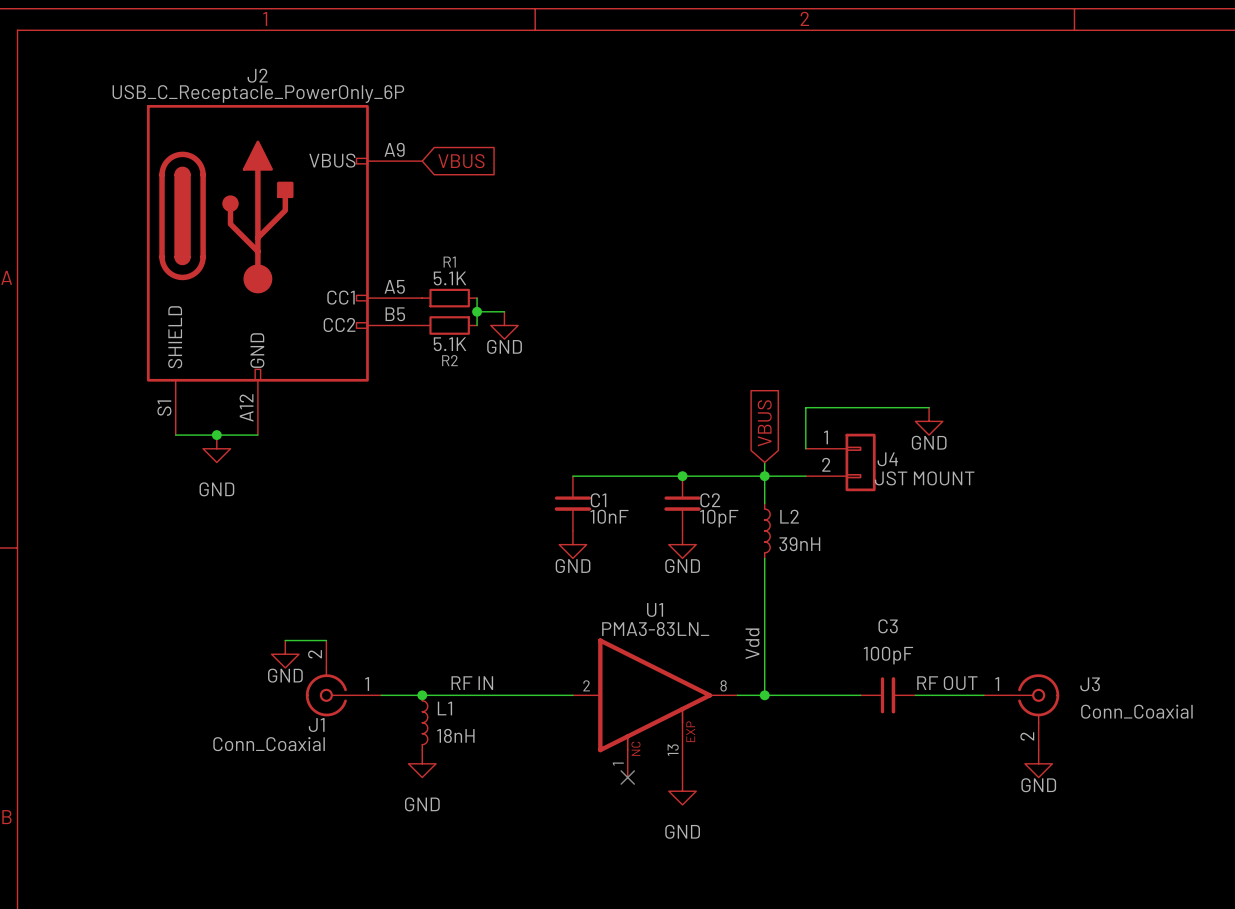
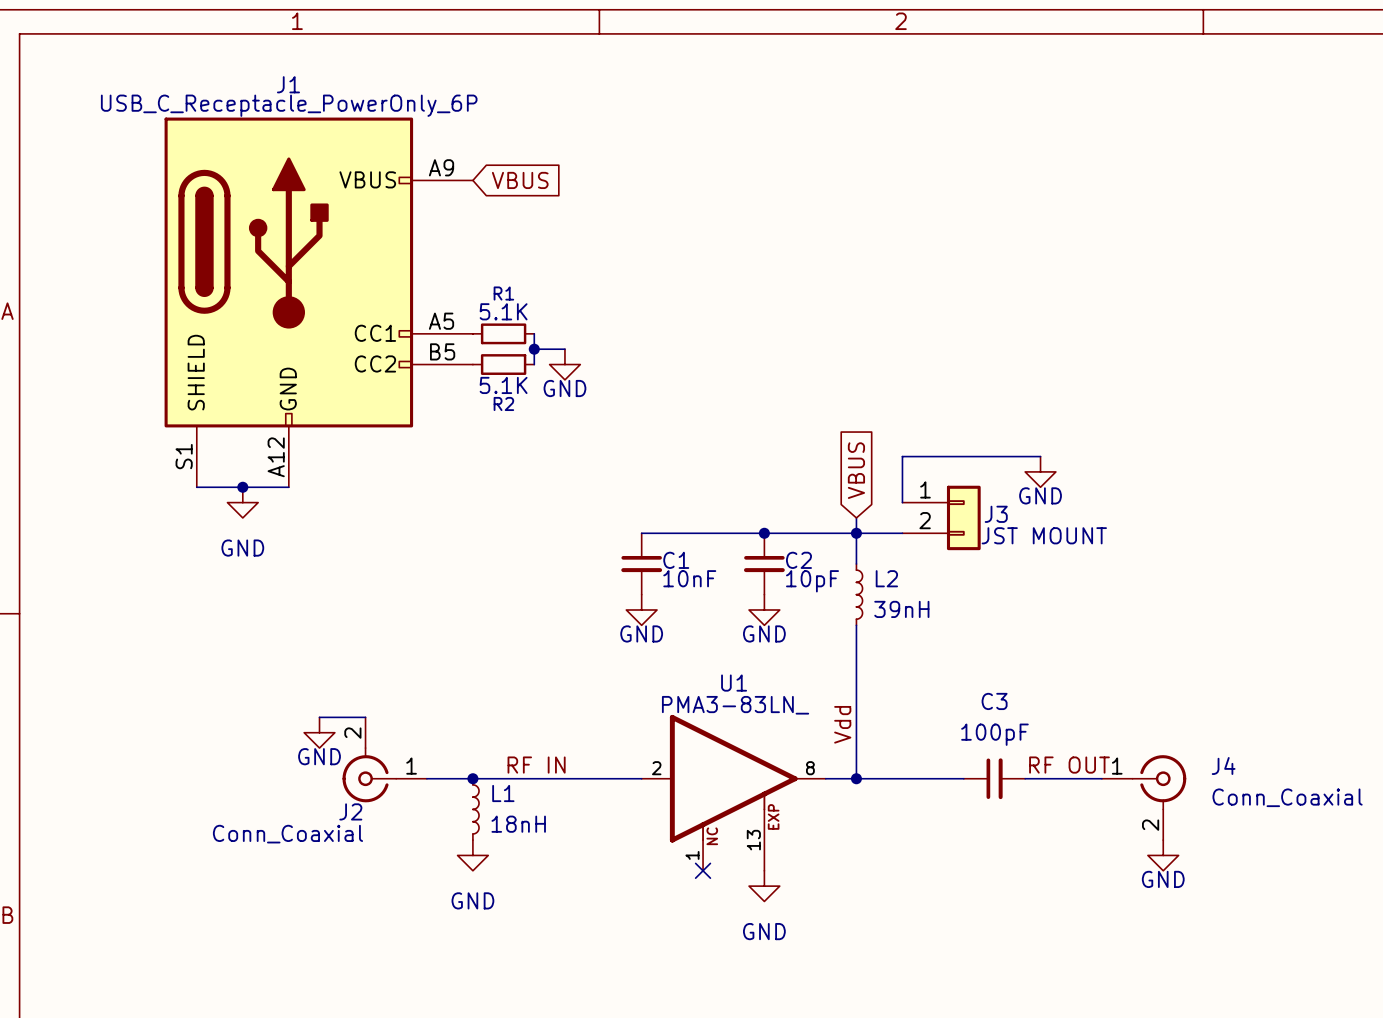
J2 name: J2 (257, 75) -> J1 (288, 84)
J4 name: J4 (887, 459) -> J3 (996, 514)
J3 name: J3 (1090, 684) -> J4 (1223, 766)
J1 name: J1 (316, 725) -> J2 (350, 811)

